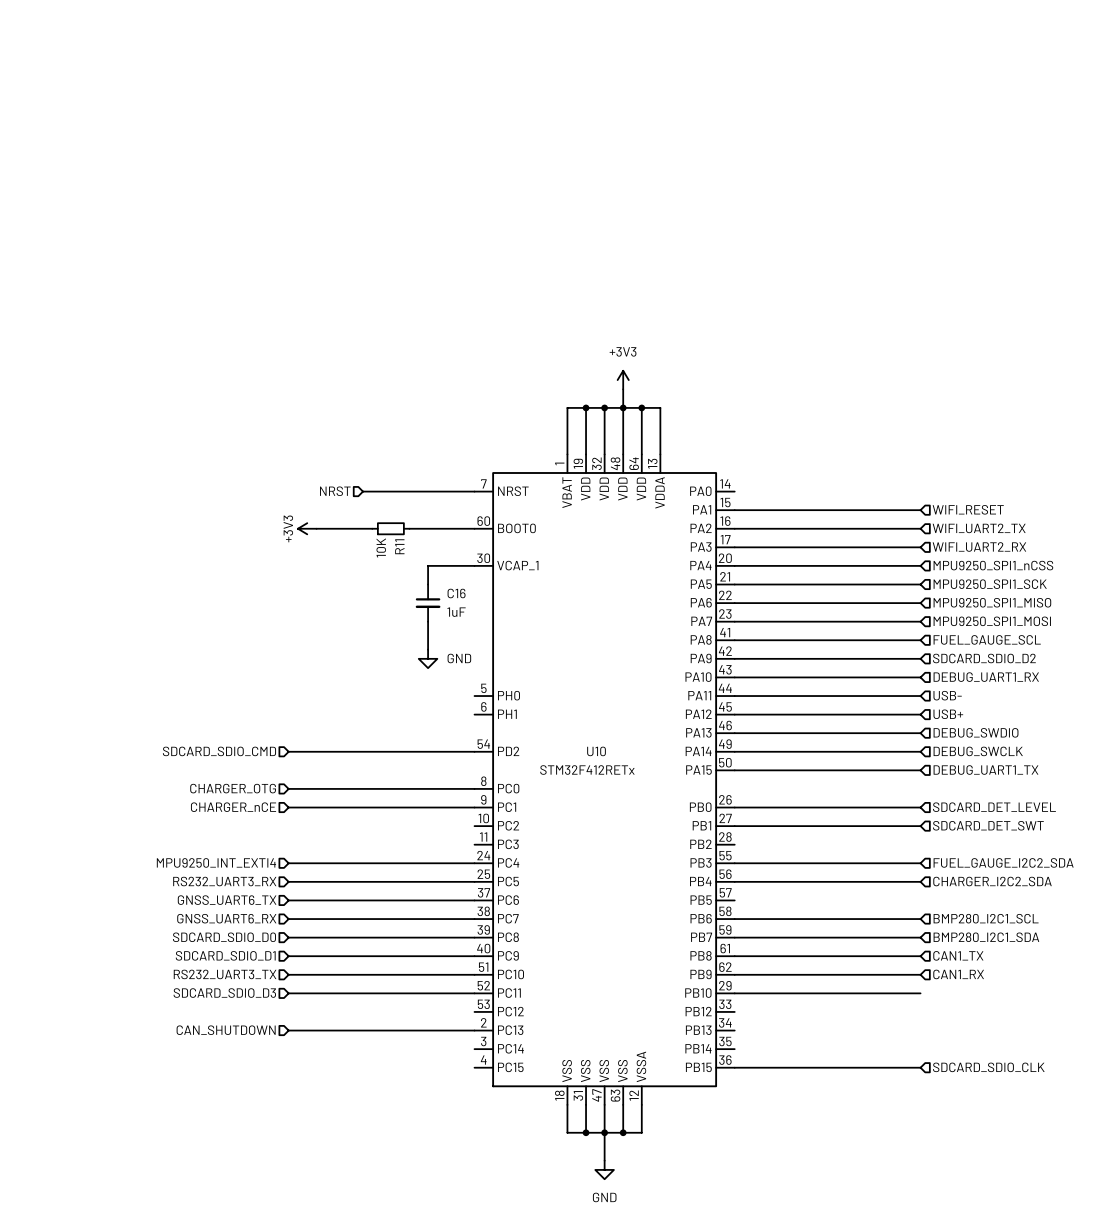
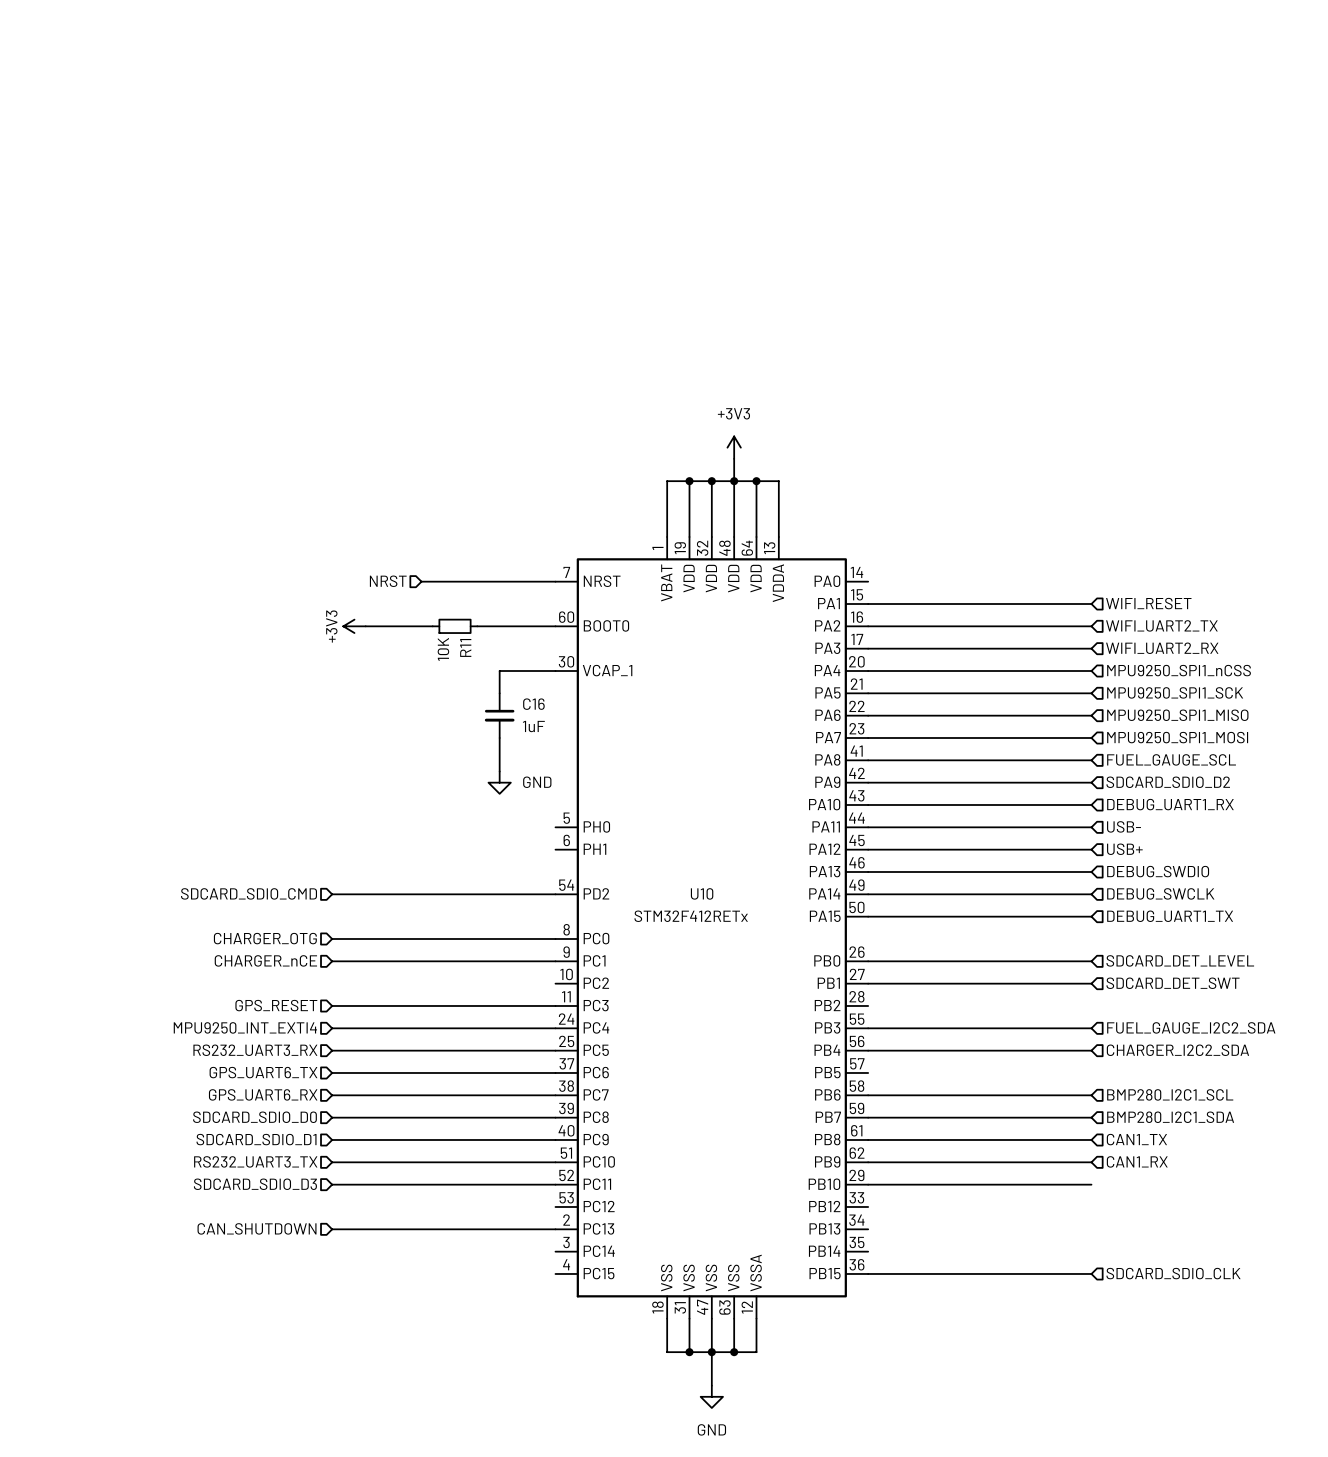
hierarchical label: none -> GPS_RESET (276, 1005)
wire: none -> (332, 1005) (555, 1005)
hierarchical label: GNSS_UART6_TX (227, 900) -> GPS_UART6_TX (263, 1072)
hierarchical label: GNSS_UART6_RX (226, 918) -> GPS_UART6_RX (263, 1094)

